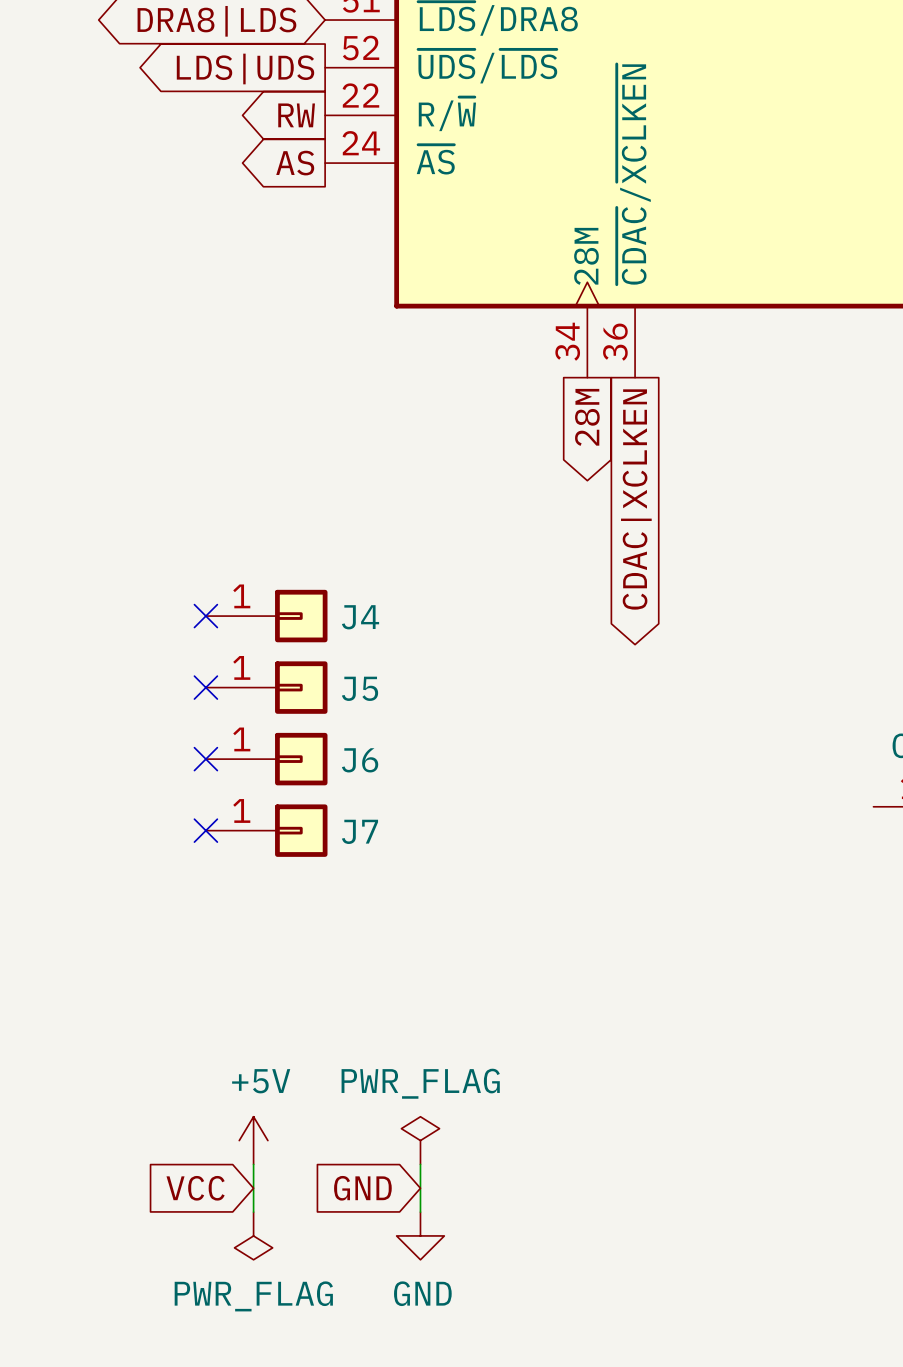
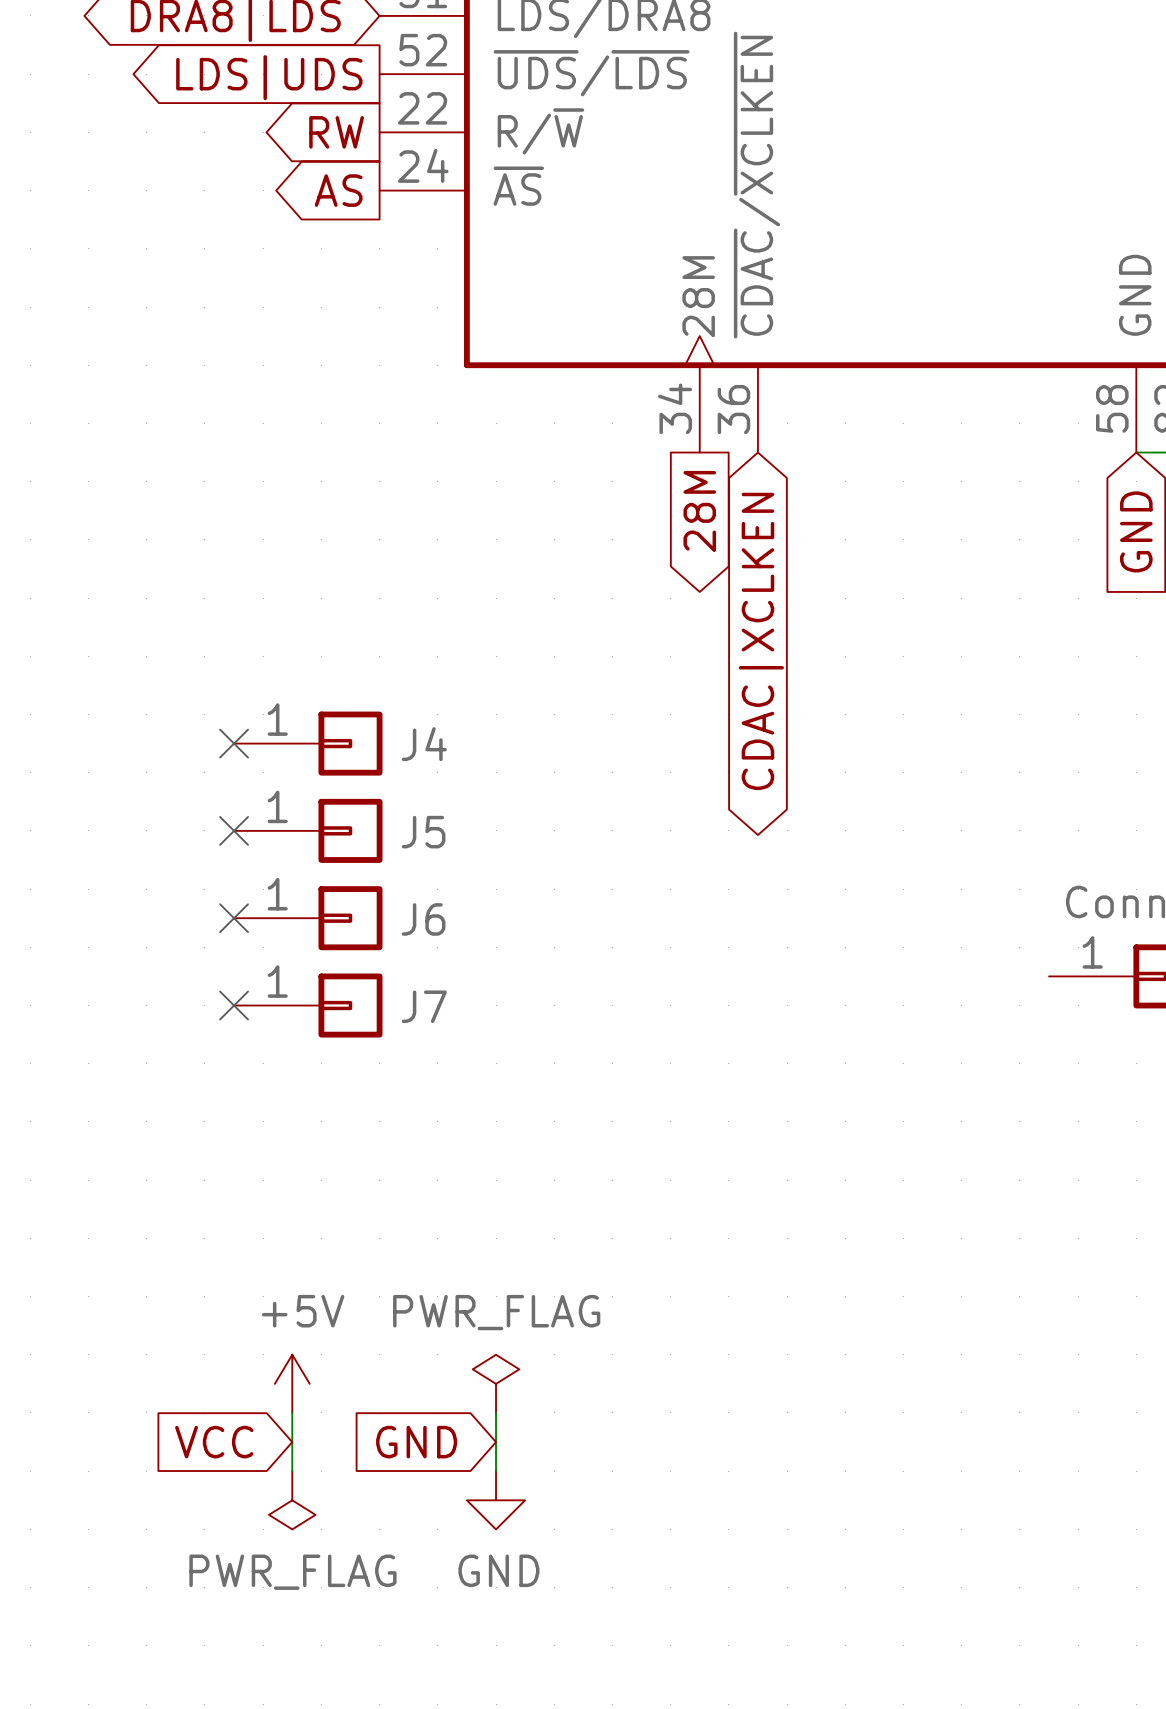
global label shape: output (636, 499) -> bidirectional (761, 641)

